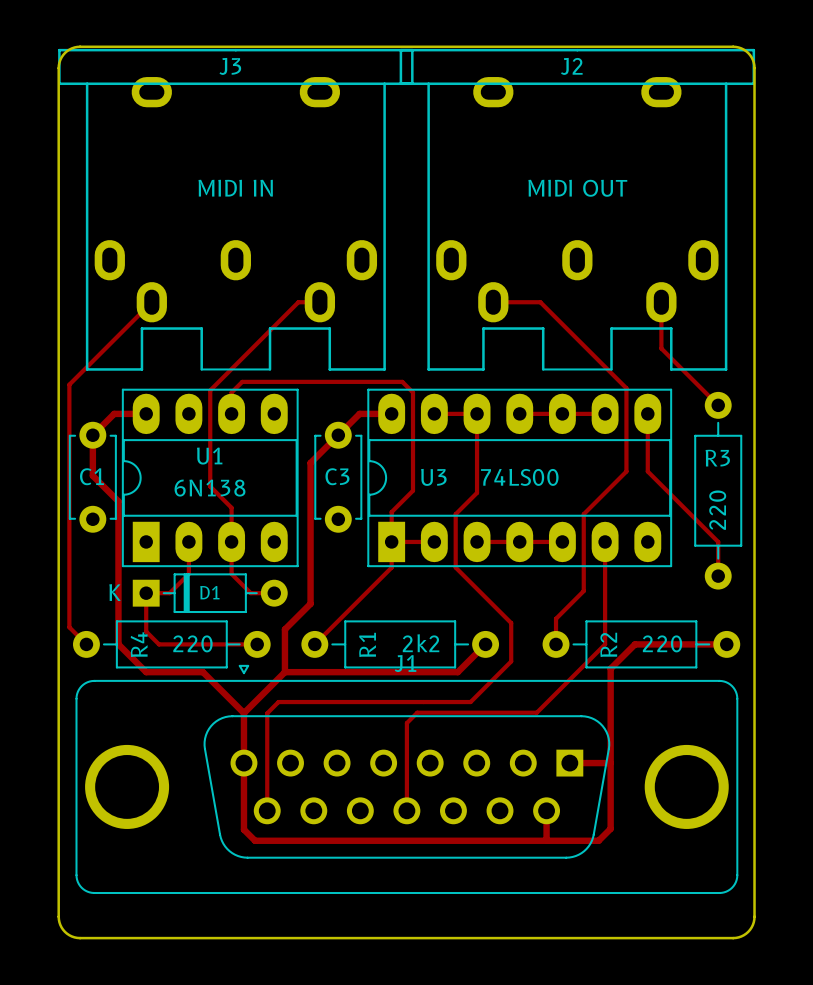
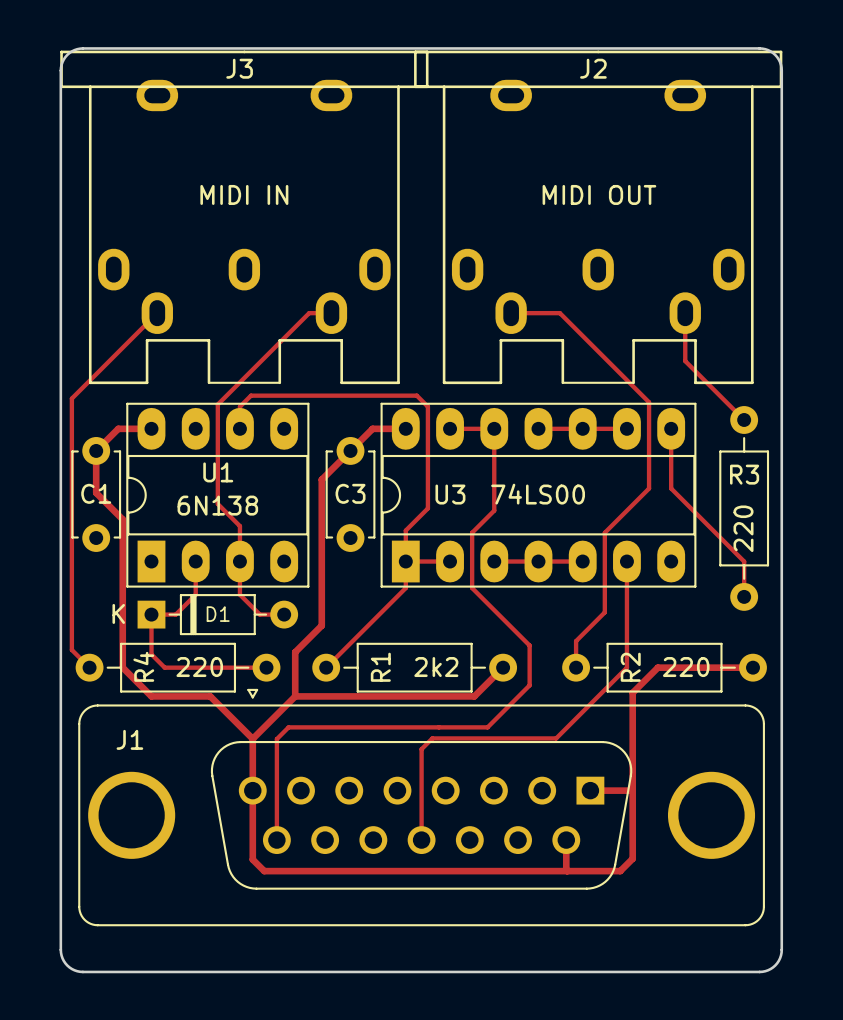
J1 name position: J1 (405, 663) -> J1 (129, 739)

